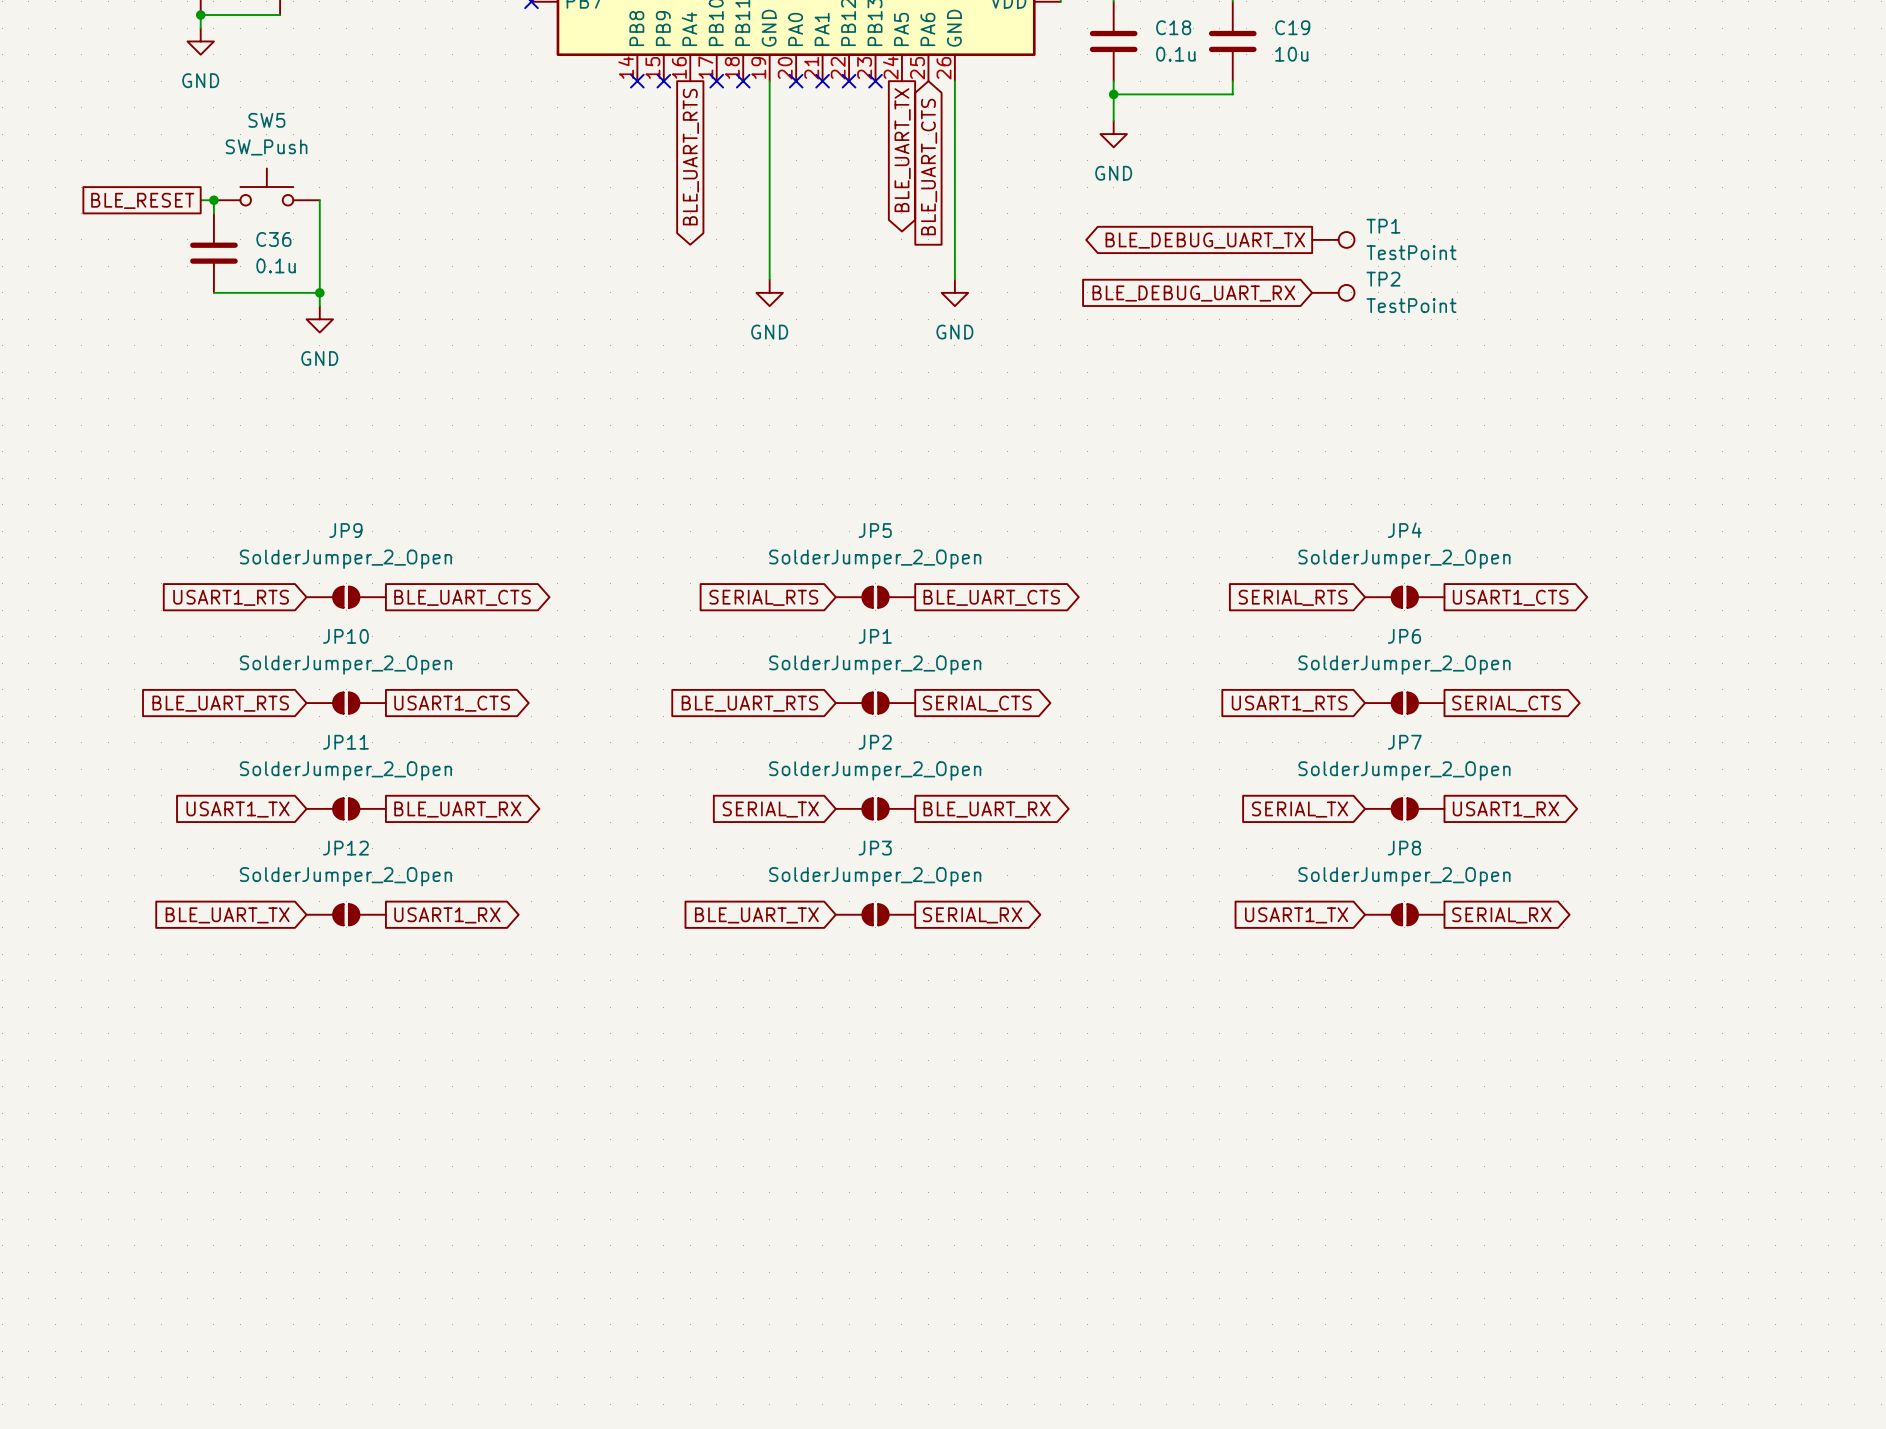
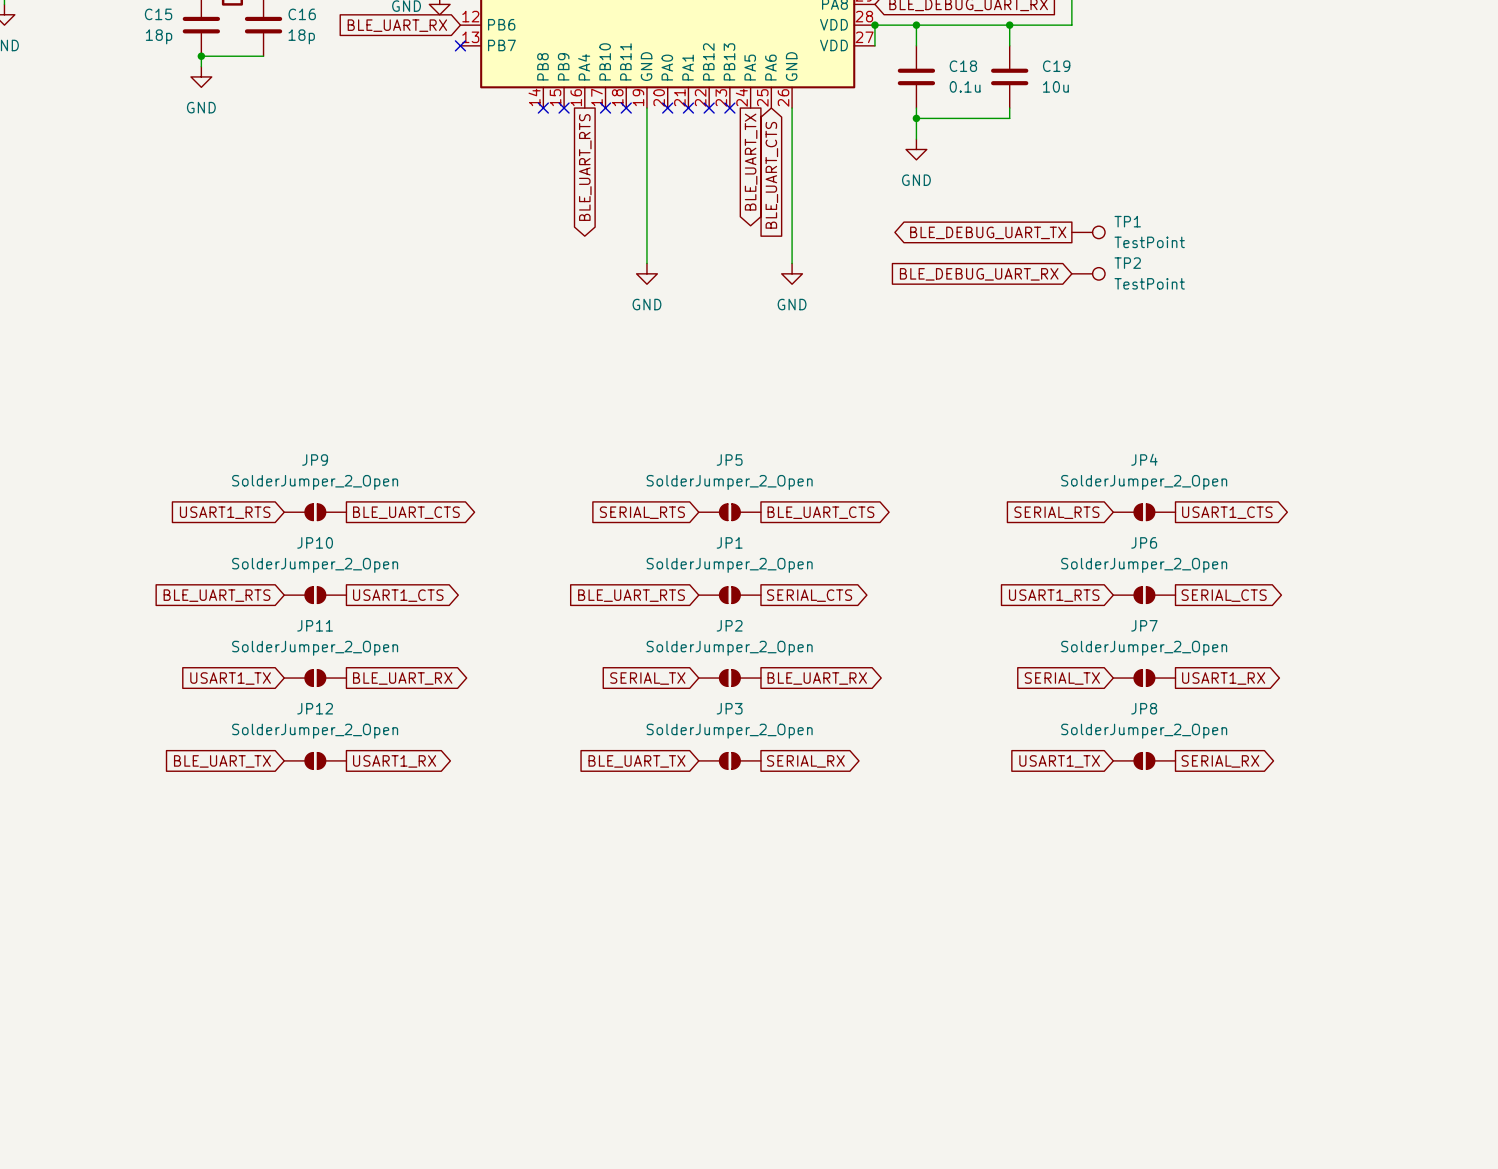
SW5: SW_Push (266, 187) -> none
global label: BLE_RESET (142, 200) -> none
wire: (200, 200) (213, 200) (213, 213) -> none
junction: (213, 200) -> none
wire: (319, 200) (319, 306) -> none
C36: 0.1u (213, 253) -> none
wire: (213, 292) (319, 292) -> none
junction: (319, 292) -> none
power symbol: GND (319, 319) -> none

